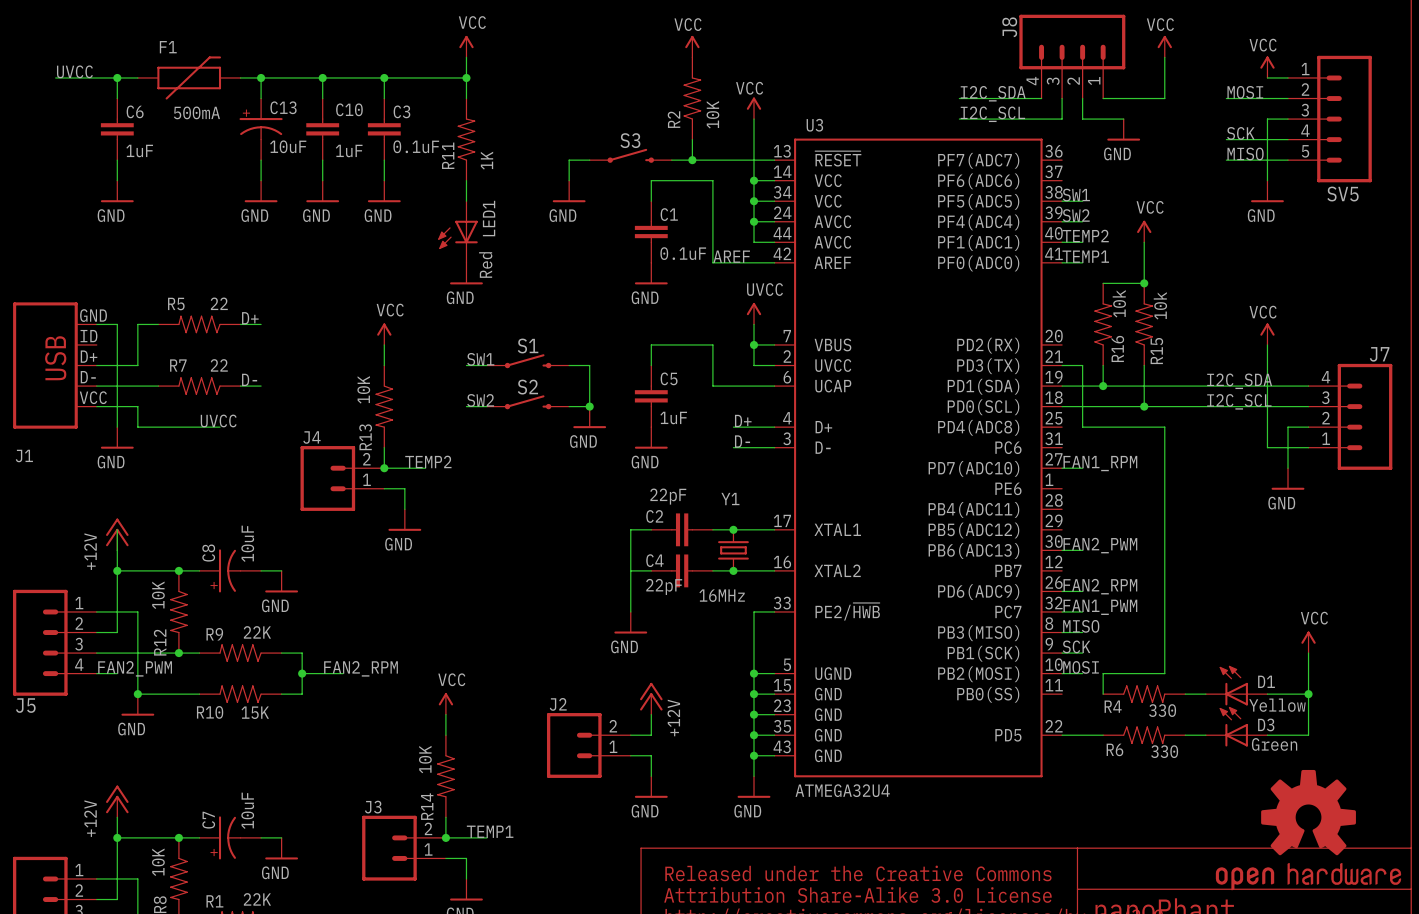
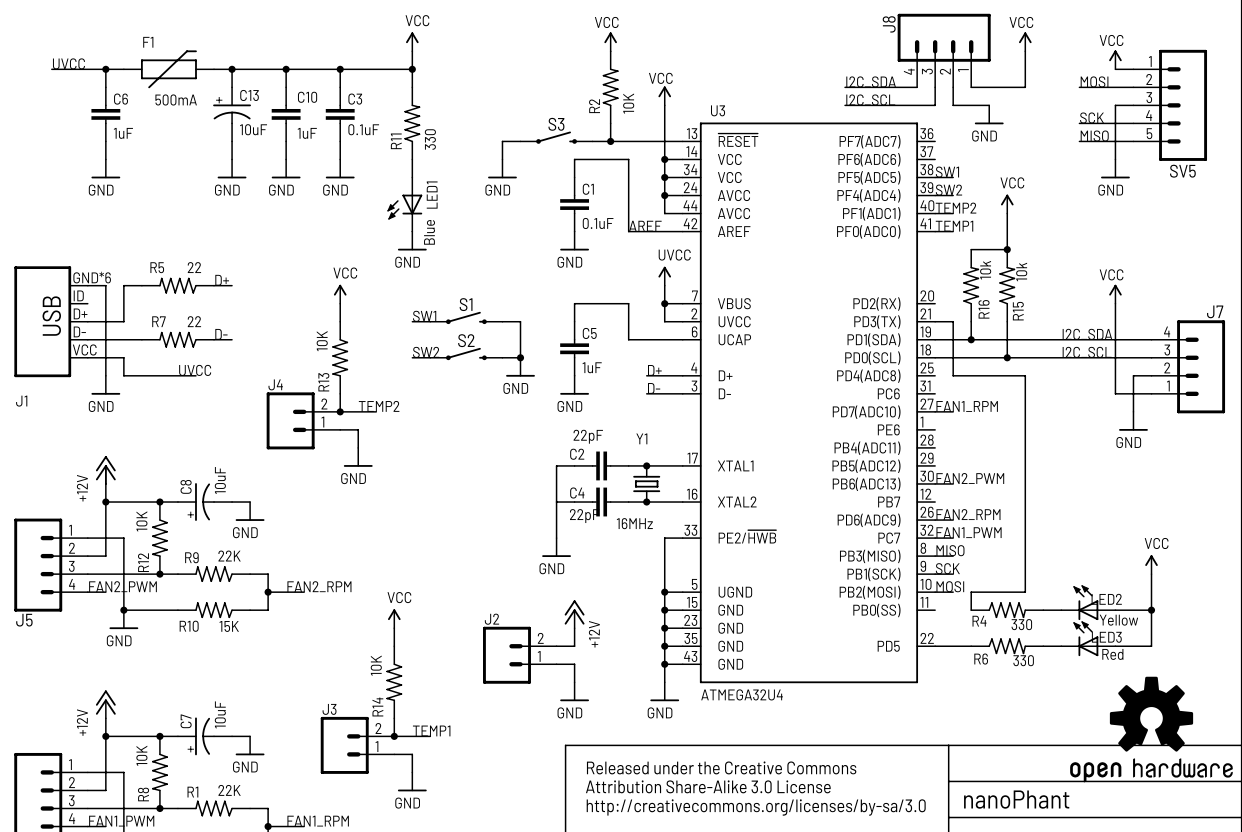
R11 value: 1K (487, 160) -> 330 (430, 139)
LED1 value: Red (485, 265) -> Blue (429, 232)
J1 pin number: GND (93, 315) -> GND*6 (92, 277)
D1 name: D1 (1266, 681) -> LED2 (1106, 599)
D3 name: D3 (1266, 724) -> LED3 (1106, 637)
D3 value: Green (1274, 744) -> Red (1112, 654)

